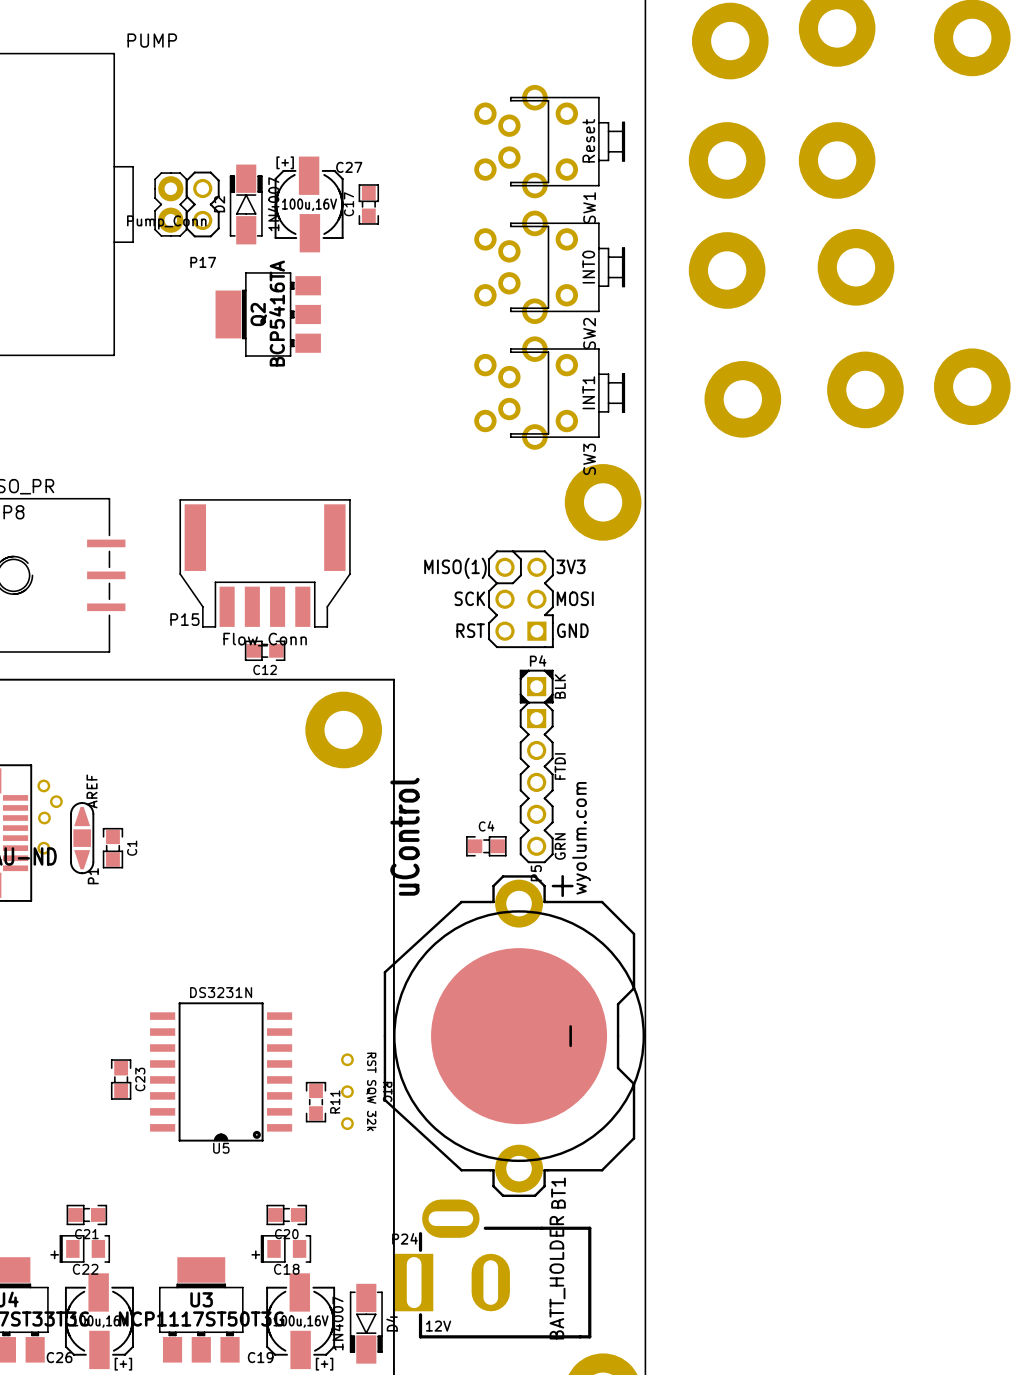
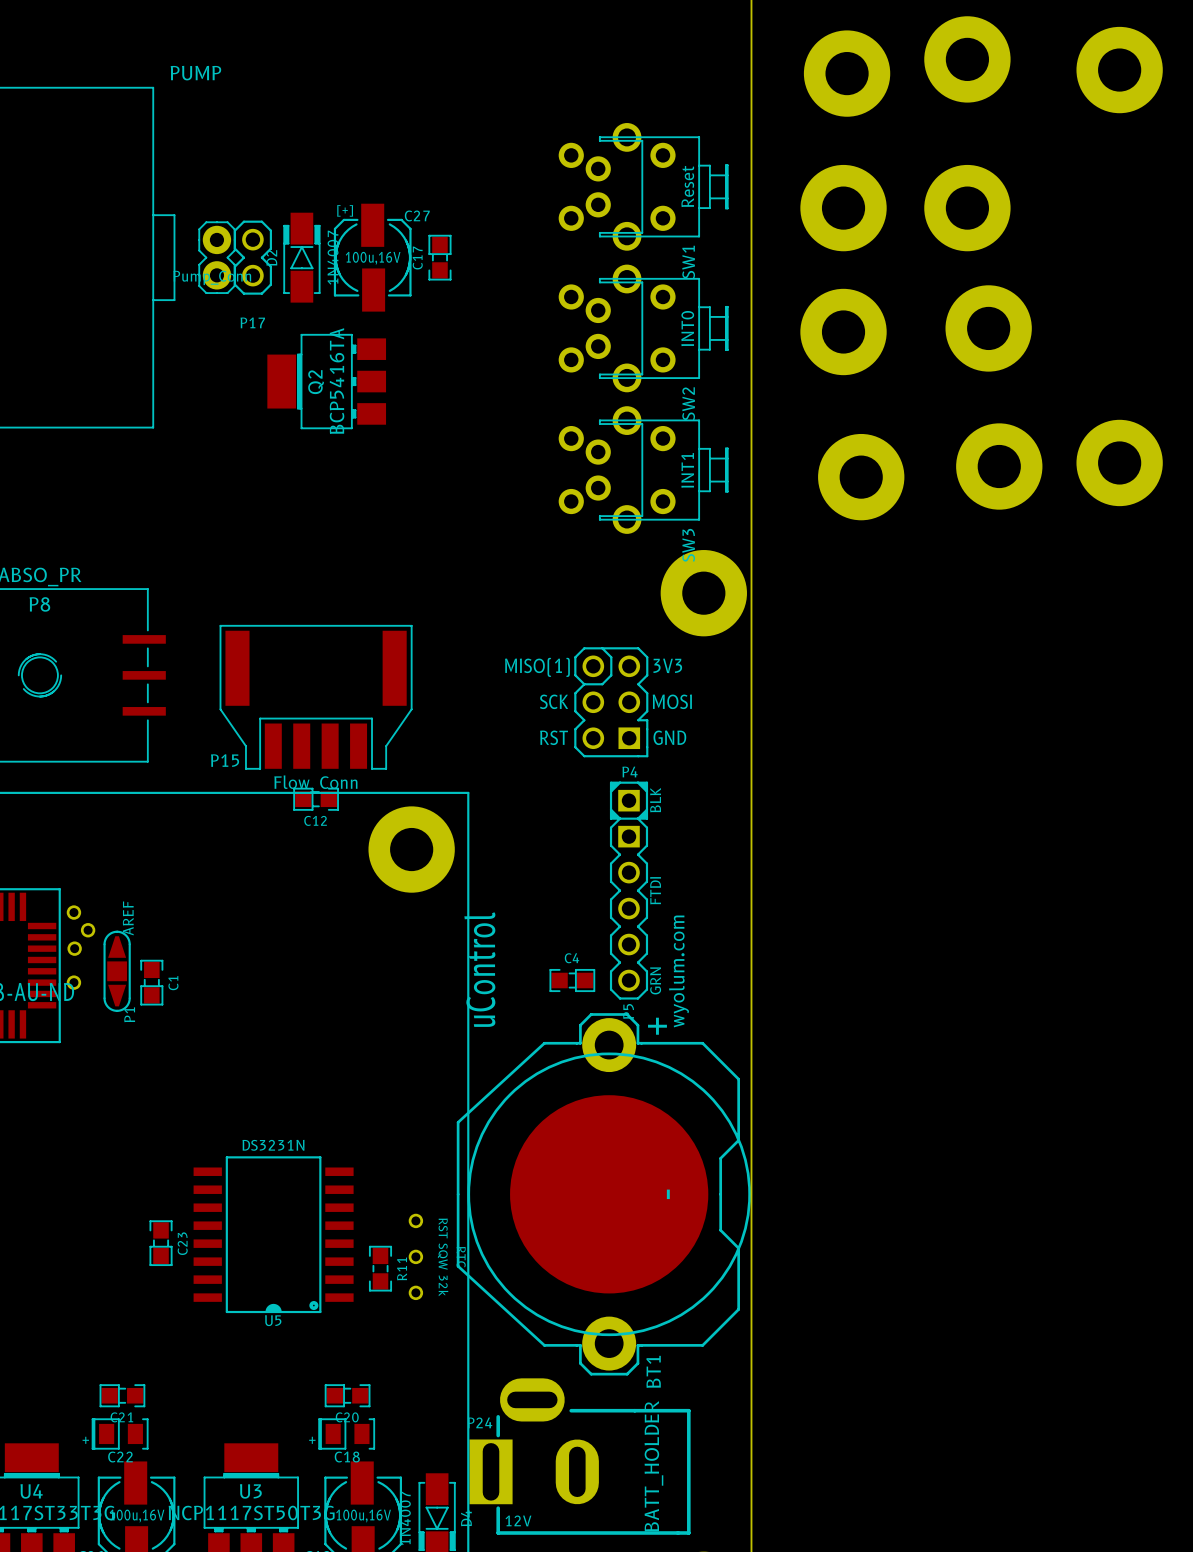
P15 position: (265, 563) -> (316, 697)
C12 position: (265, 650) -> (316, 799)

